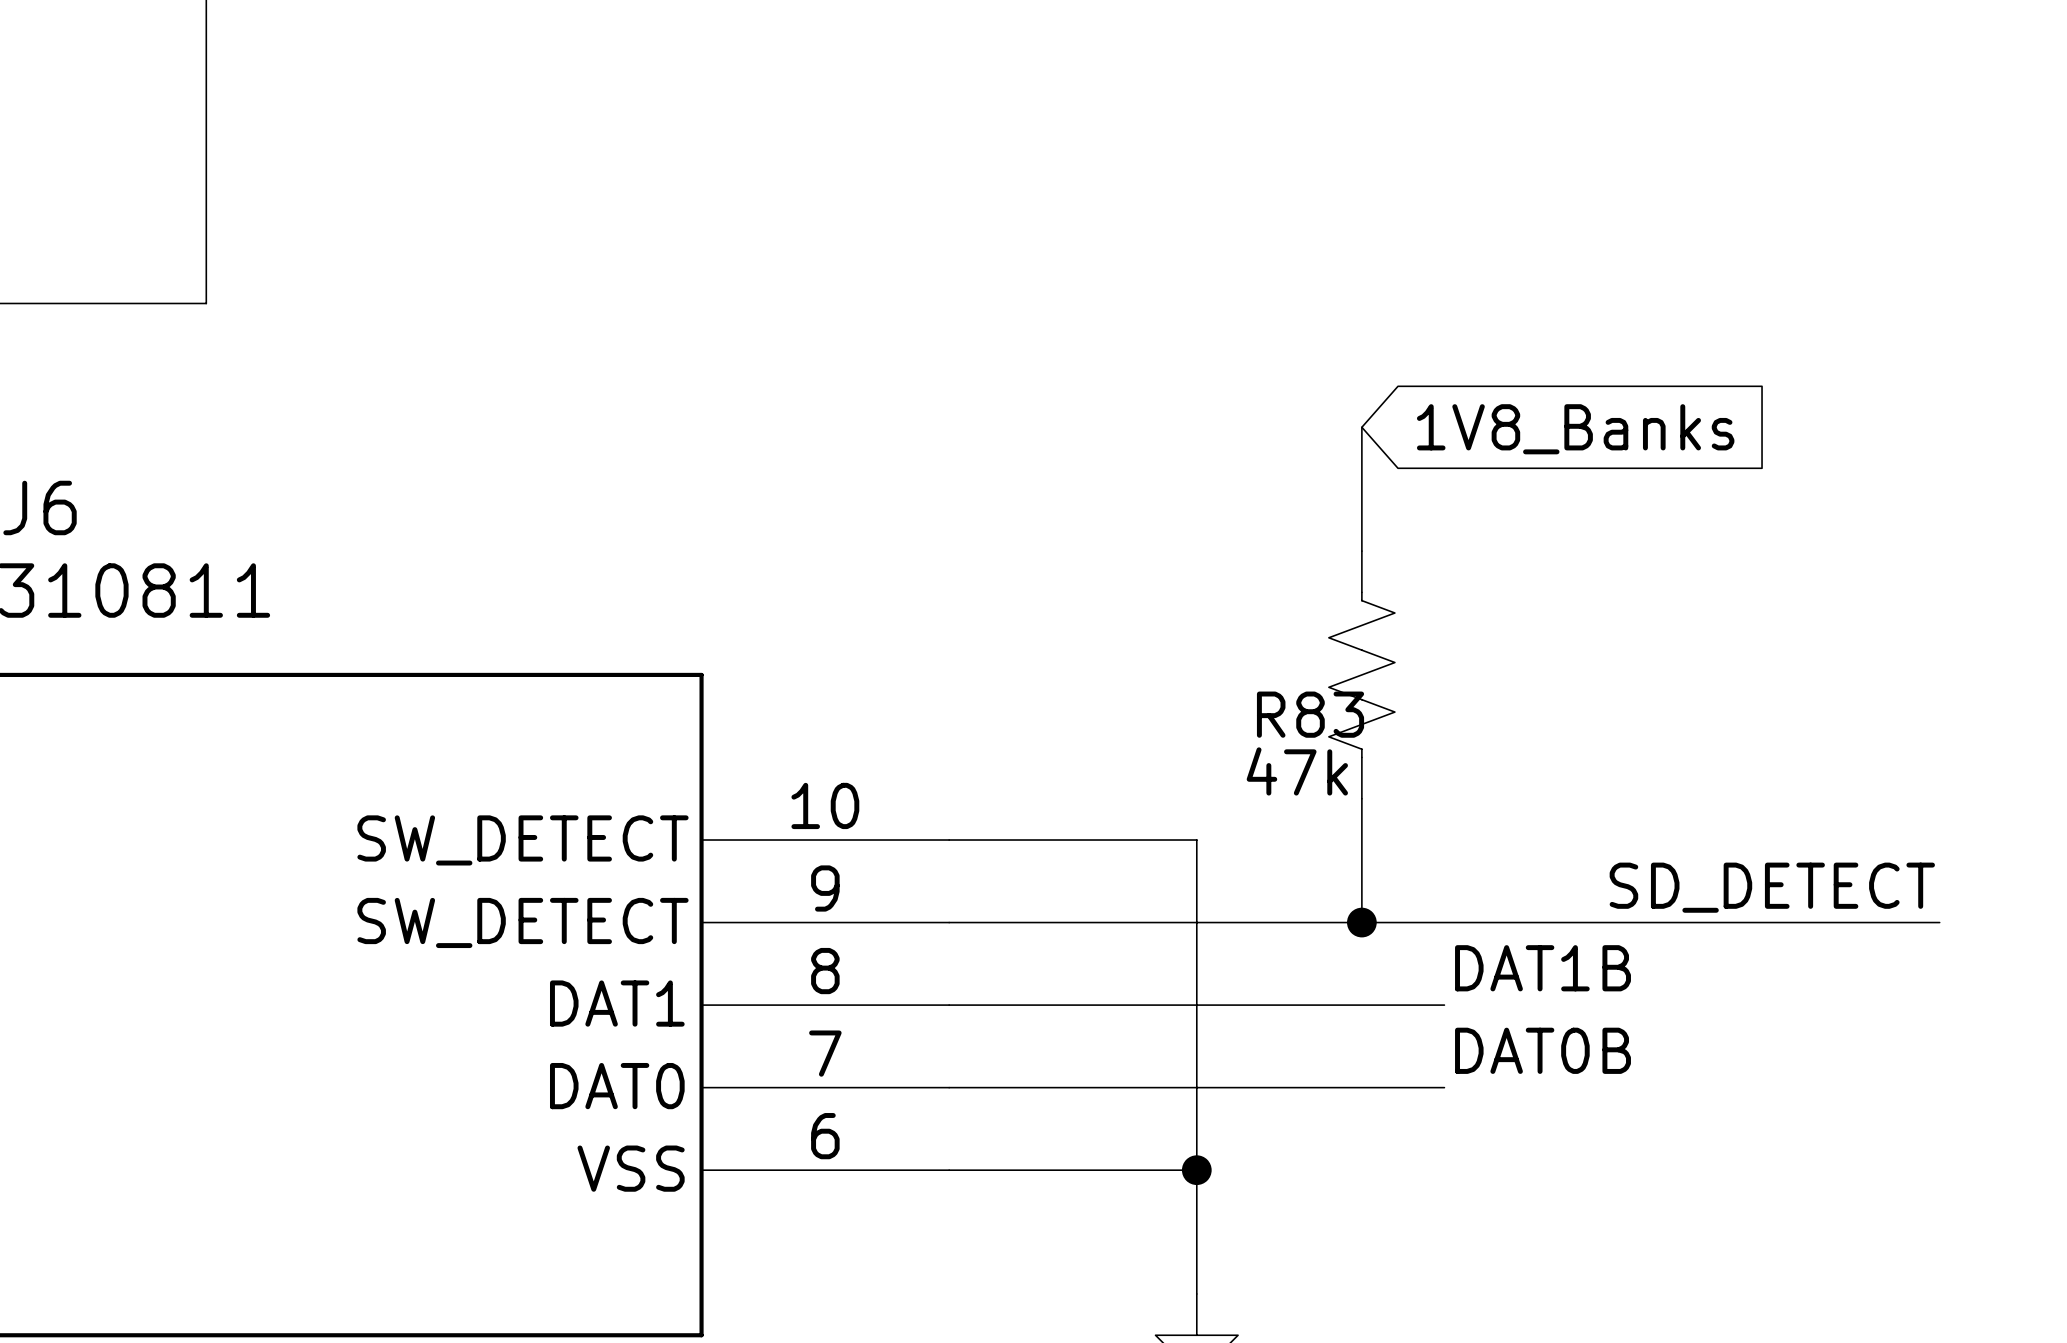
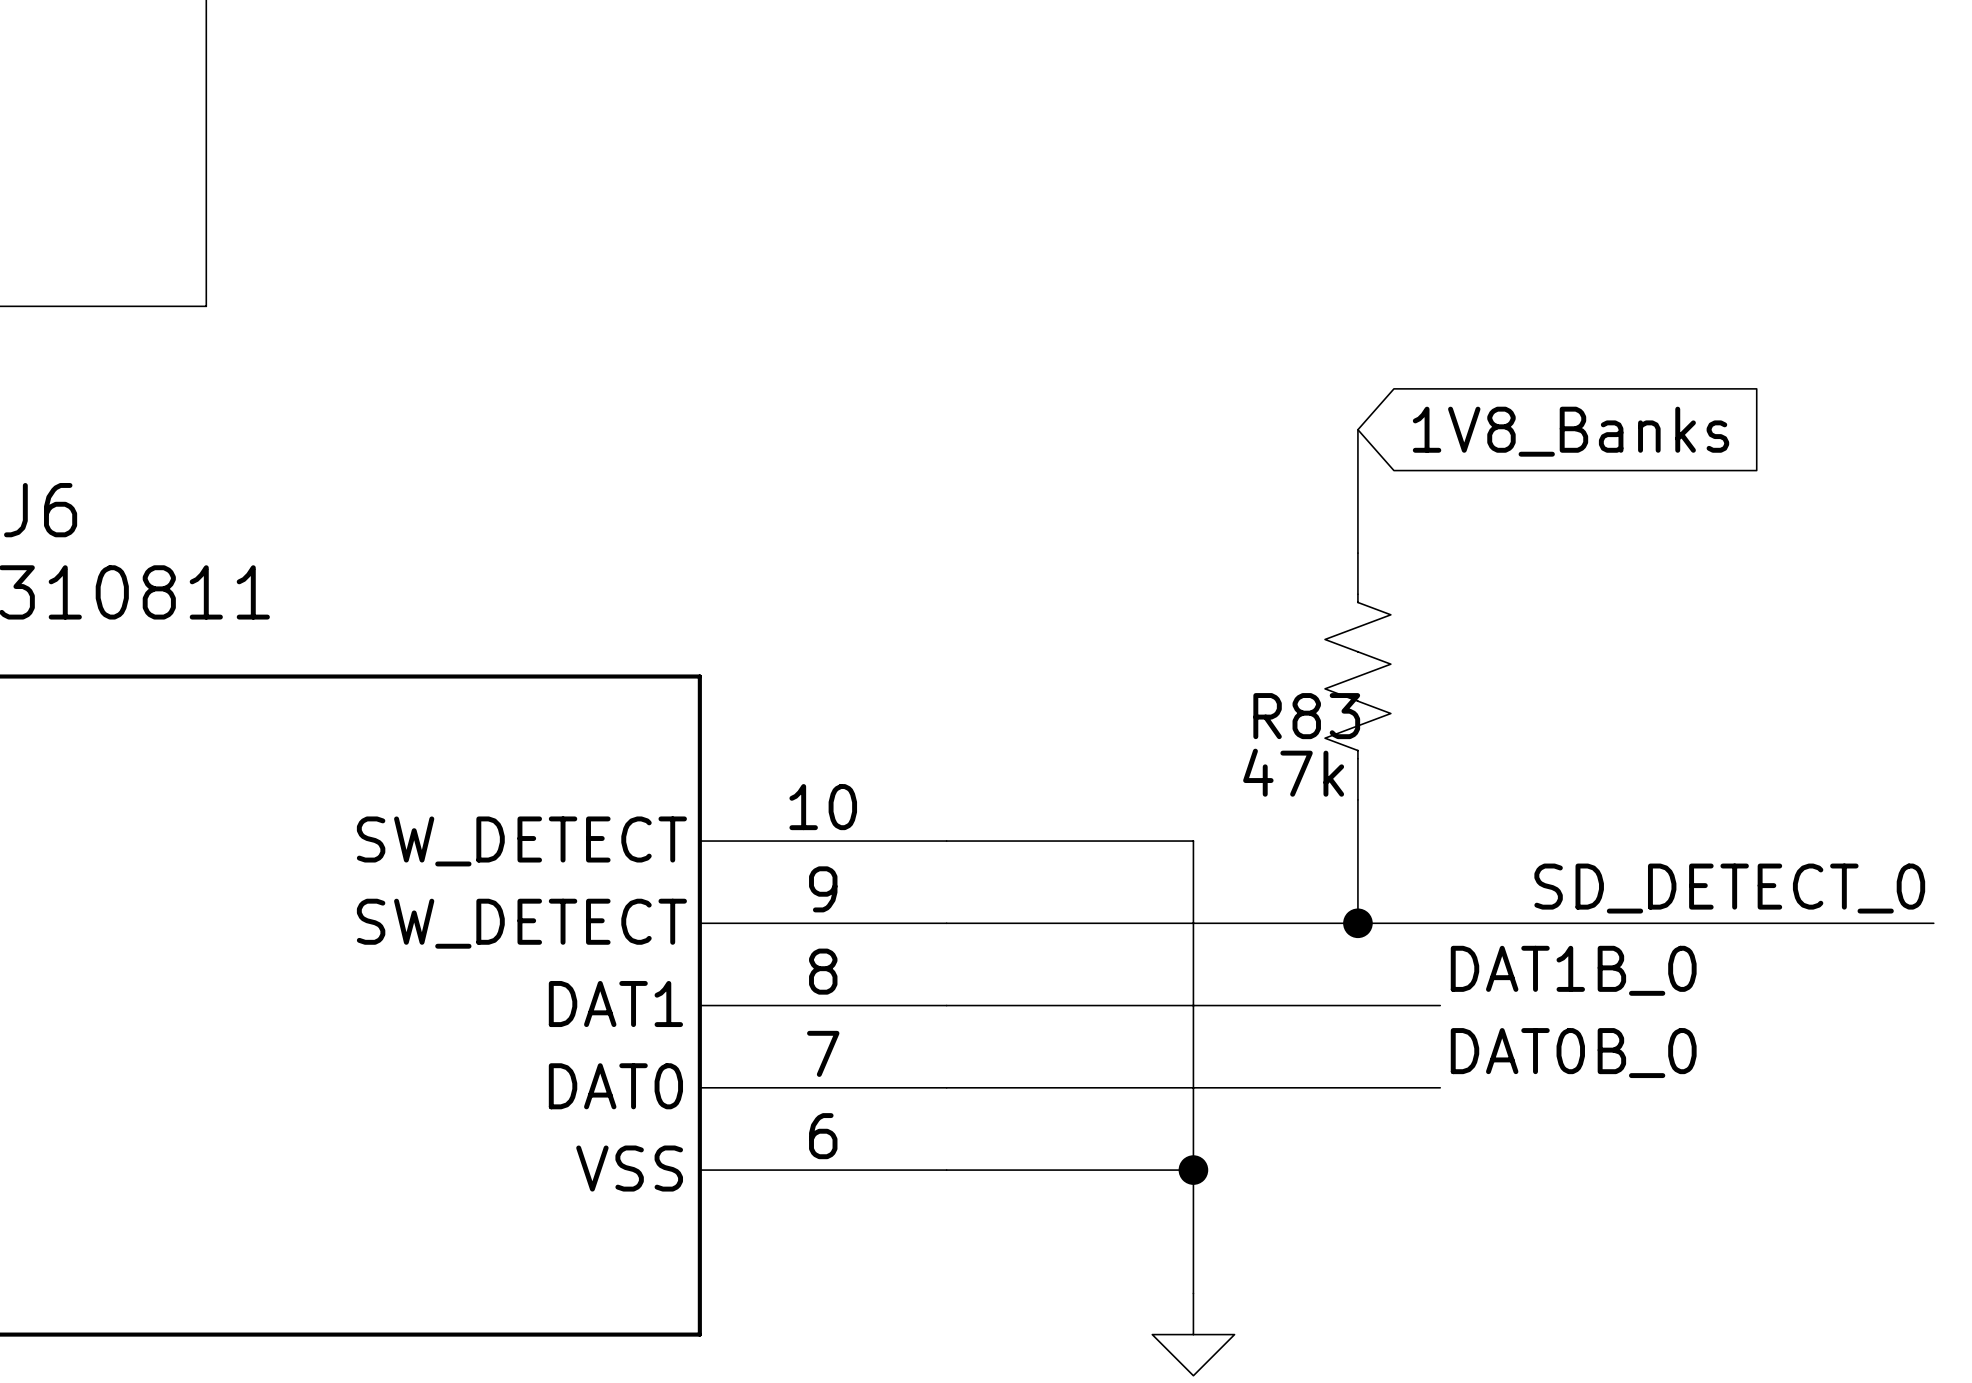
label: SD_DETECT (1772, 887) -> SD_DETECT_0 (1729, 888)
label: DAT1B (1543, 968) -> DAT1B_0 (1573, 970)
label: DAT0B (1543, 1050) -> DAT0B_0 (1573, 1053)

